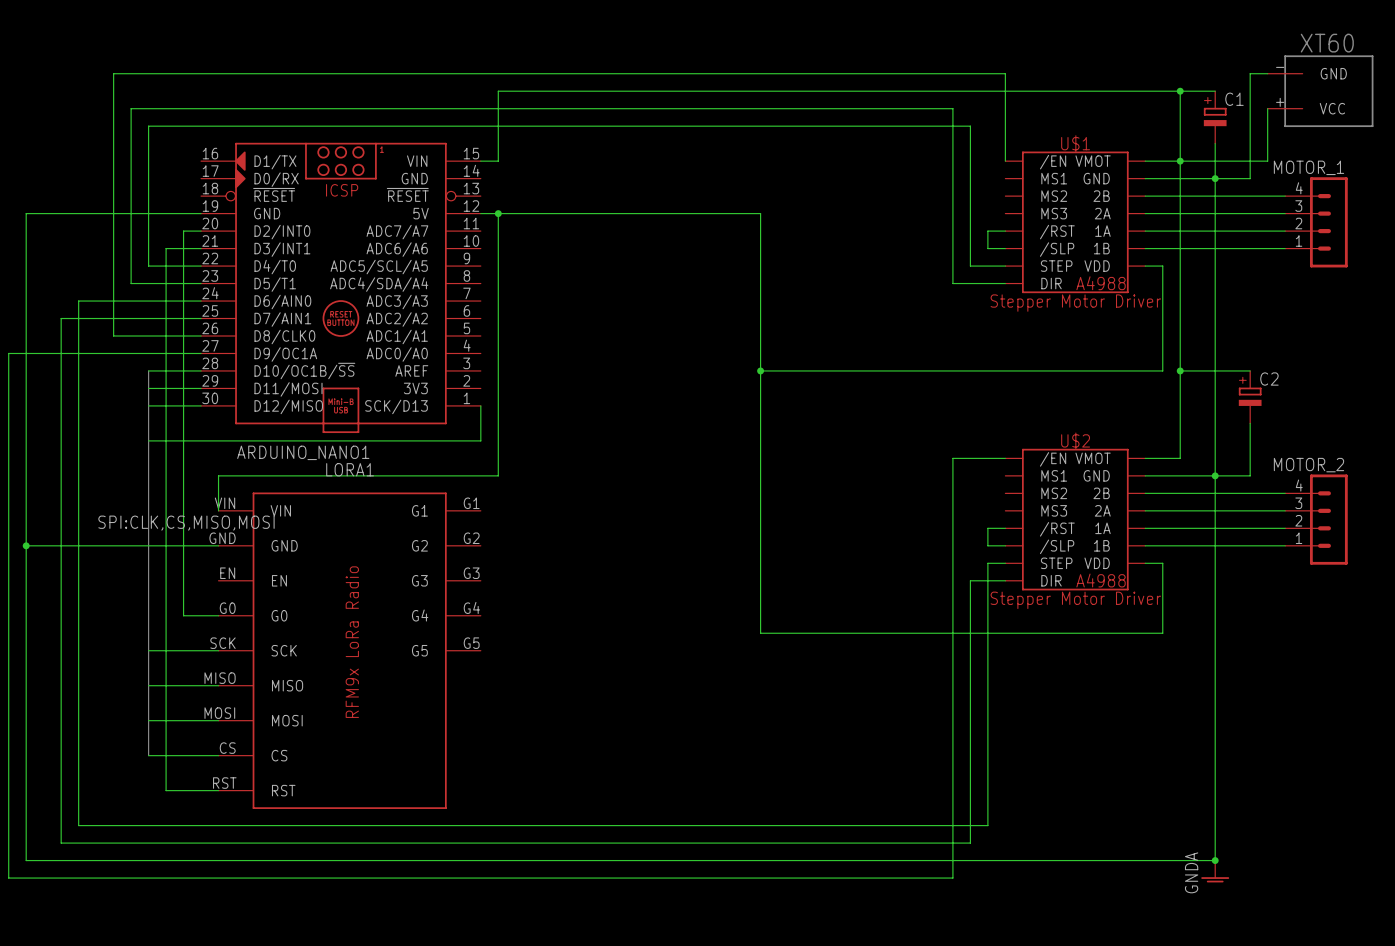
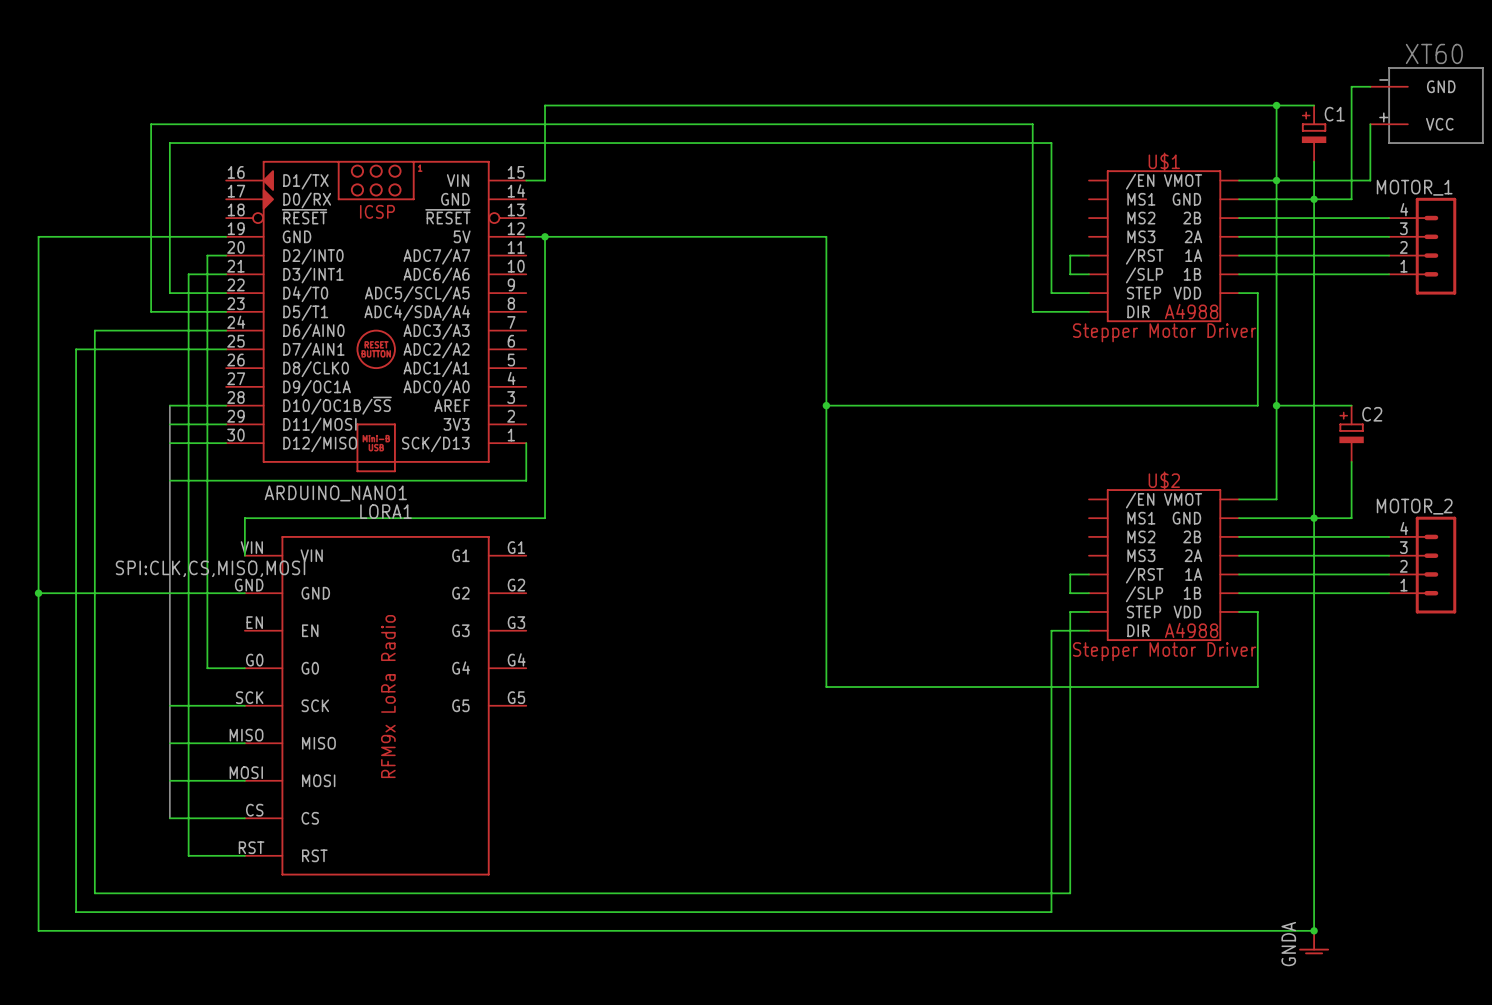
wire: (1005, 161) (1005, 73) (113, 73) (113, 336) (201, 336) -> none
wire: (201, 353) (8, 353) (8, 878) (952, 878) (952, 458) (1005, 458) -> none

